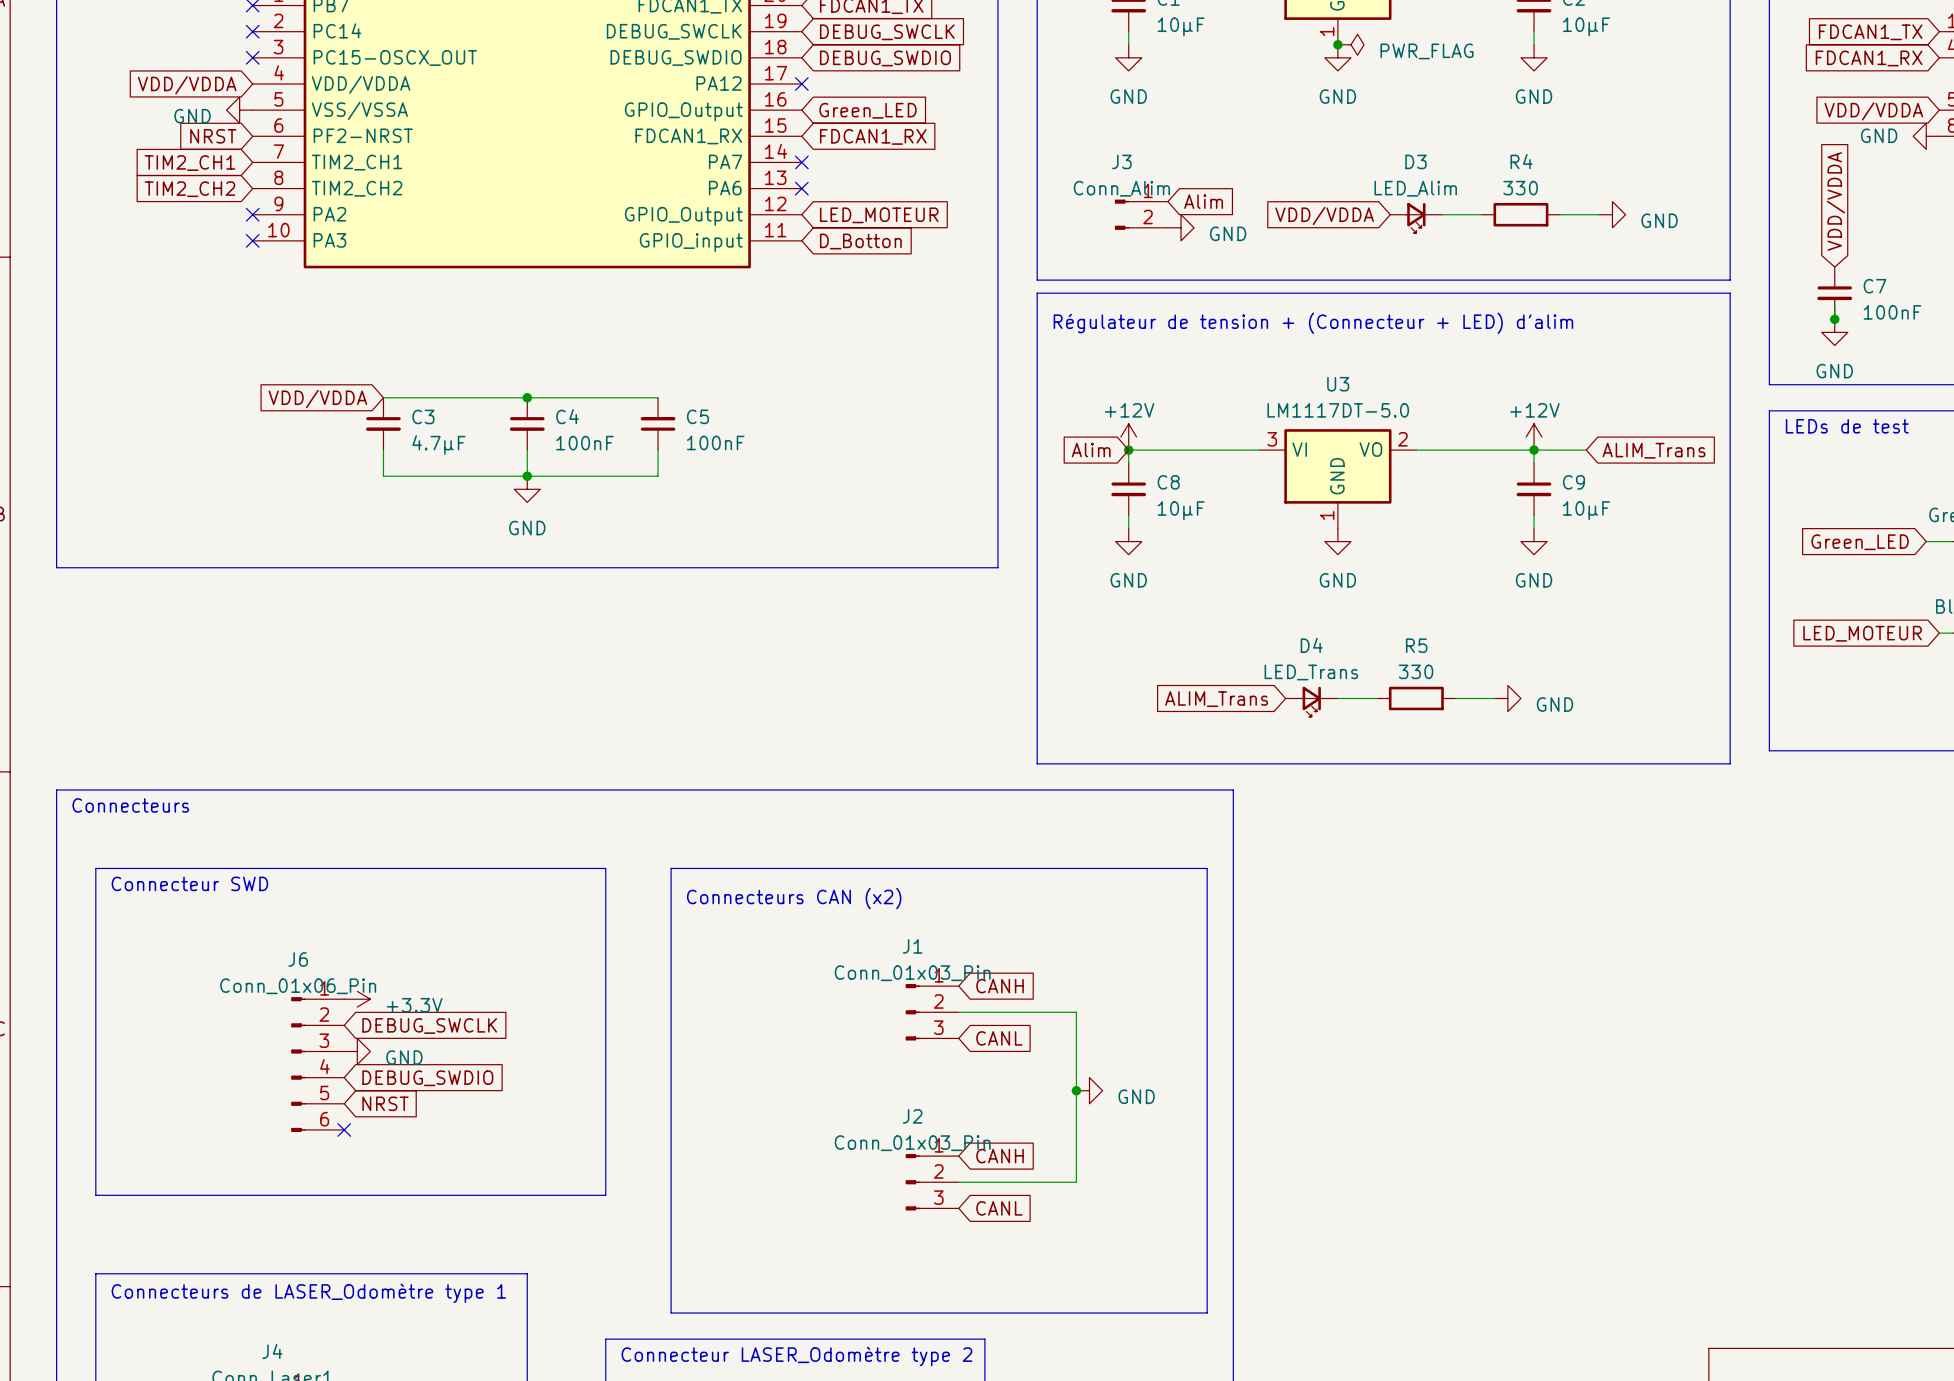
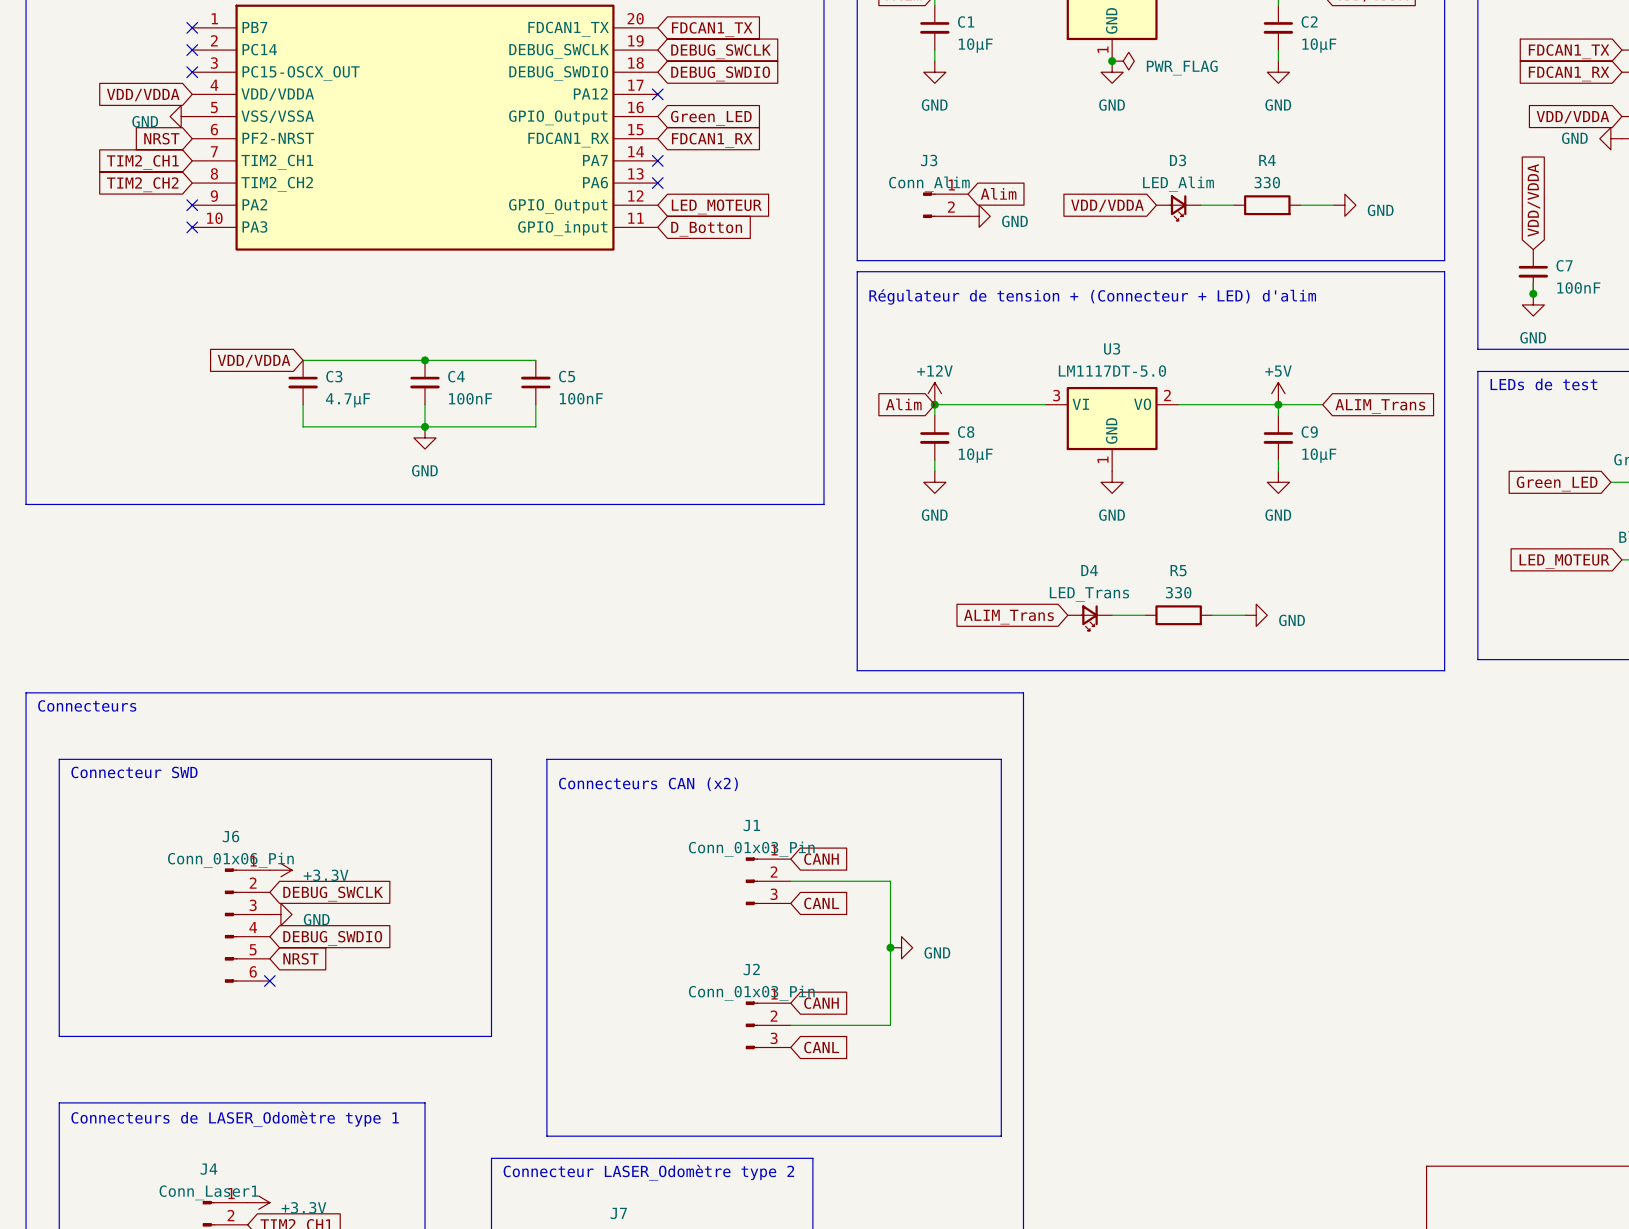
power symbol: +12V (1534, 437) -> +5V (1278, 393)

